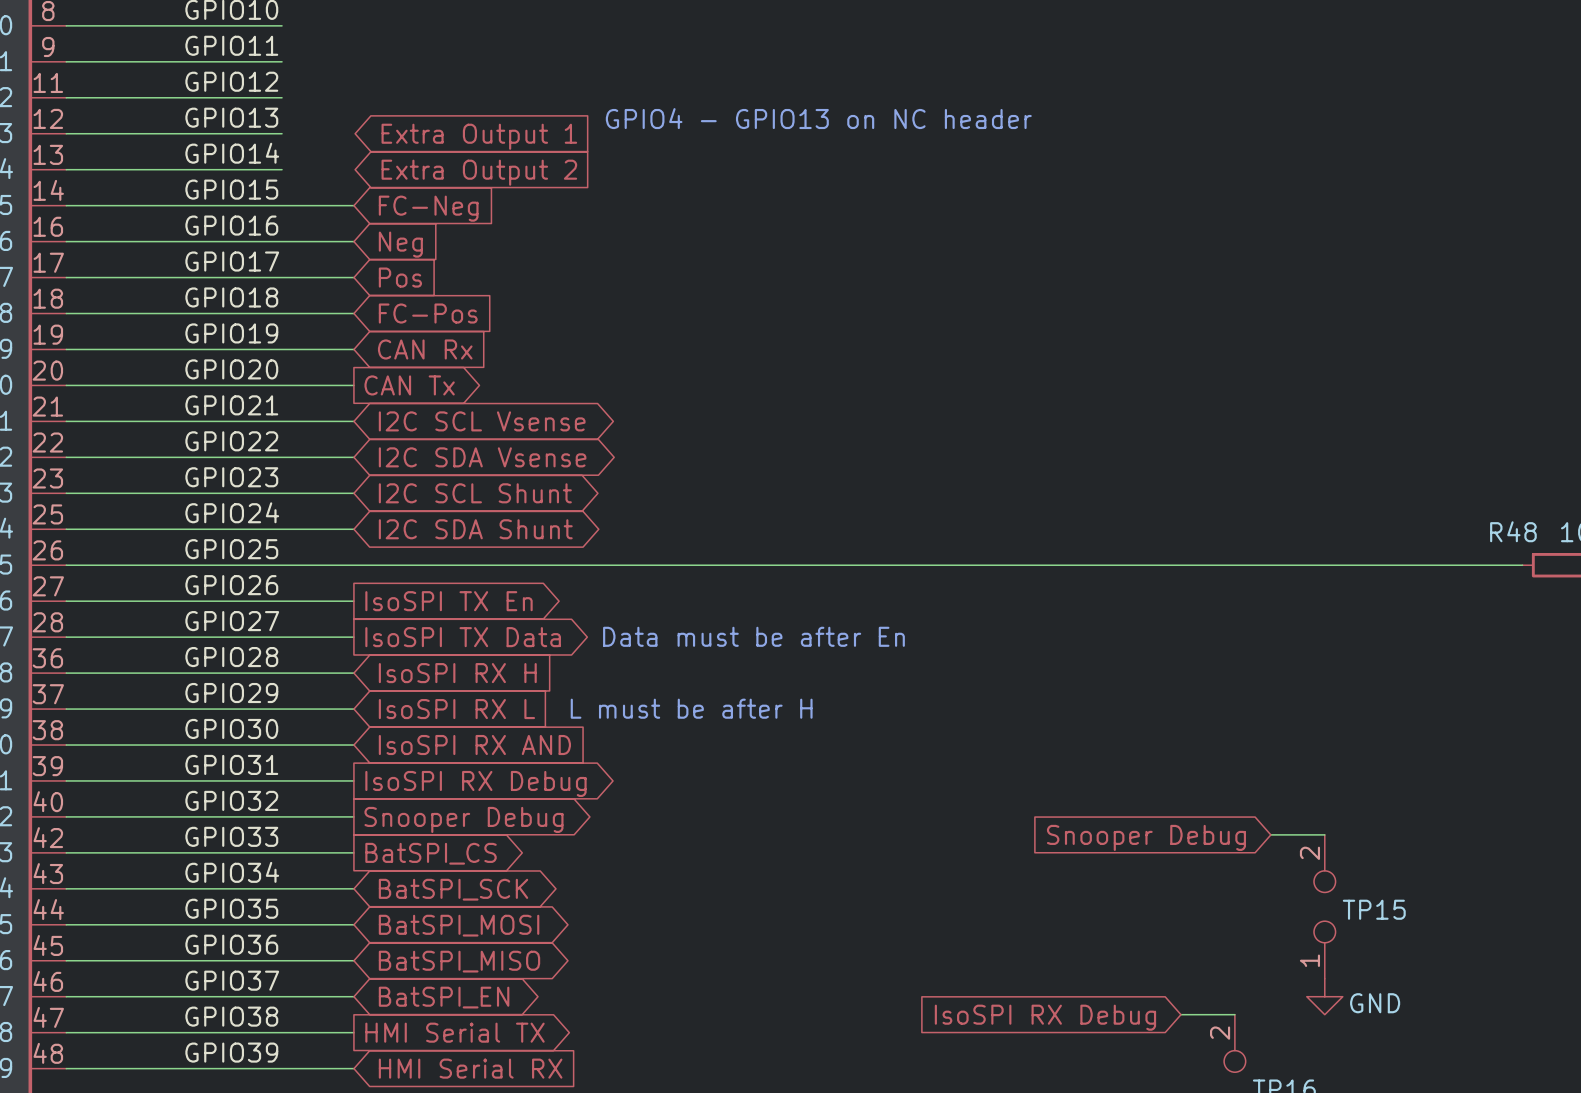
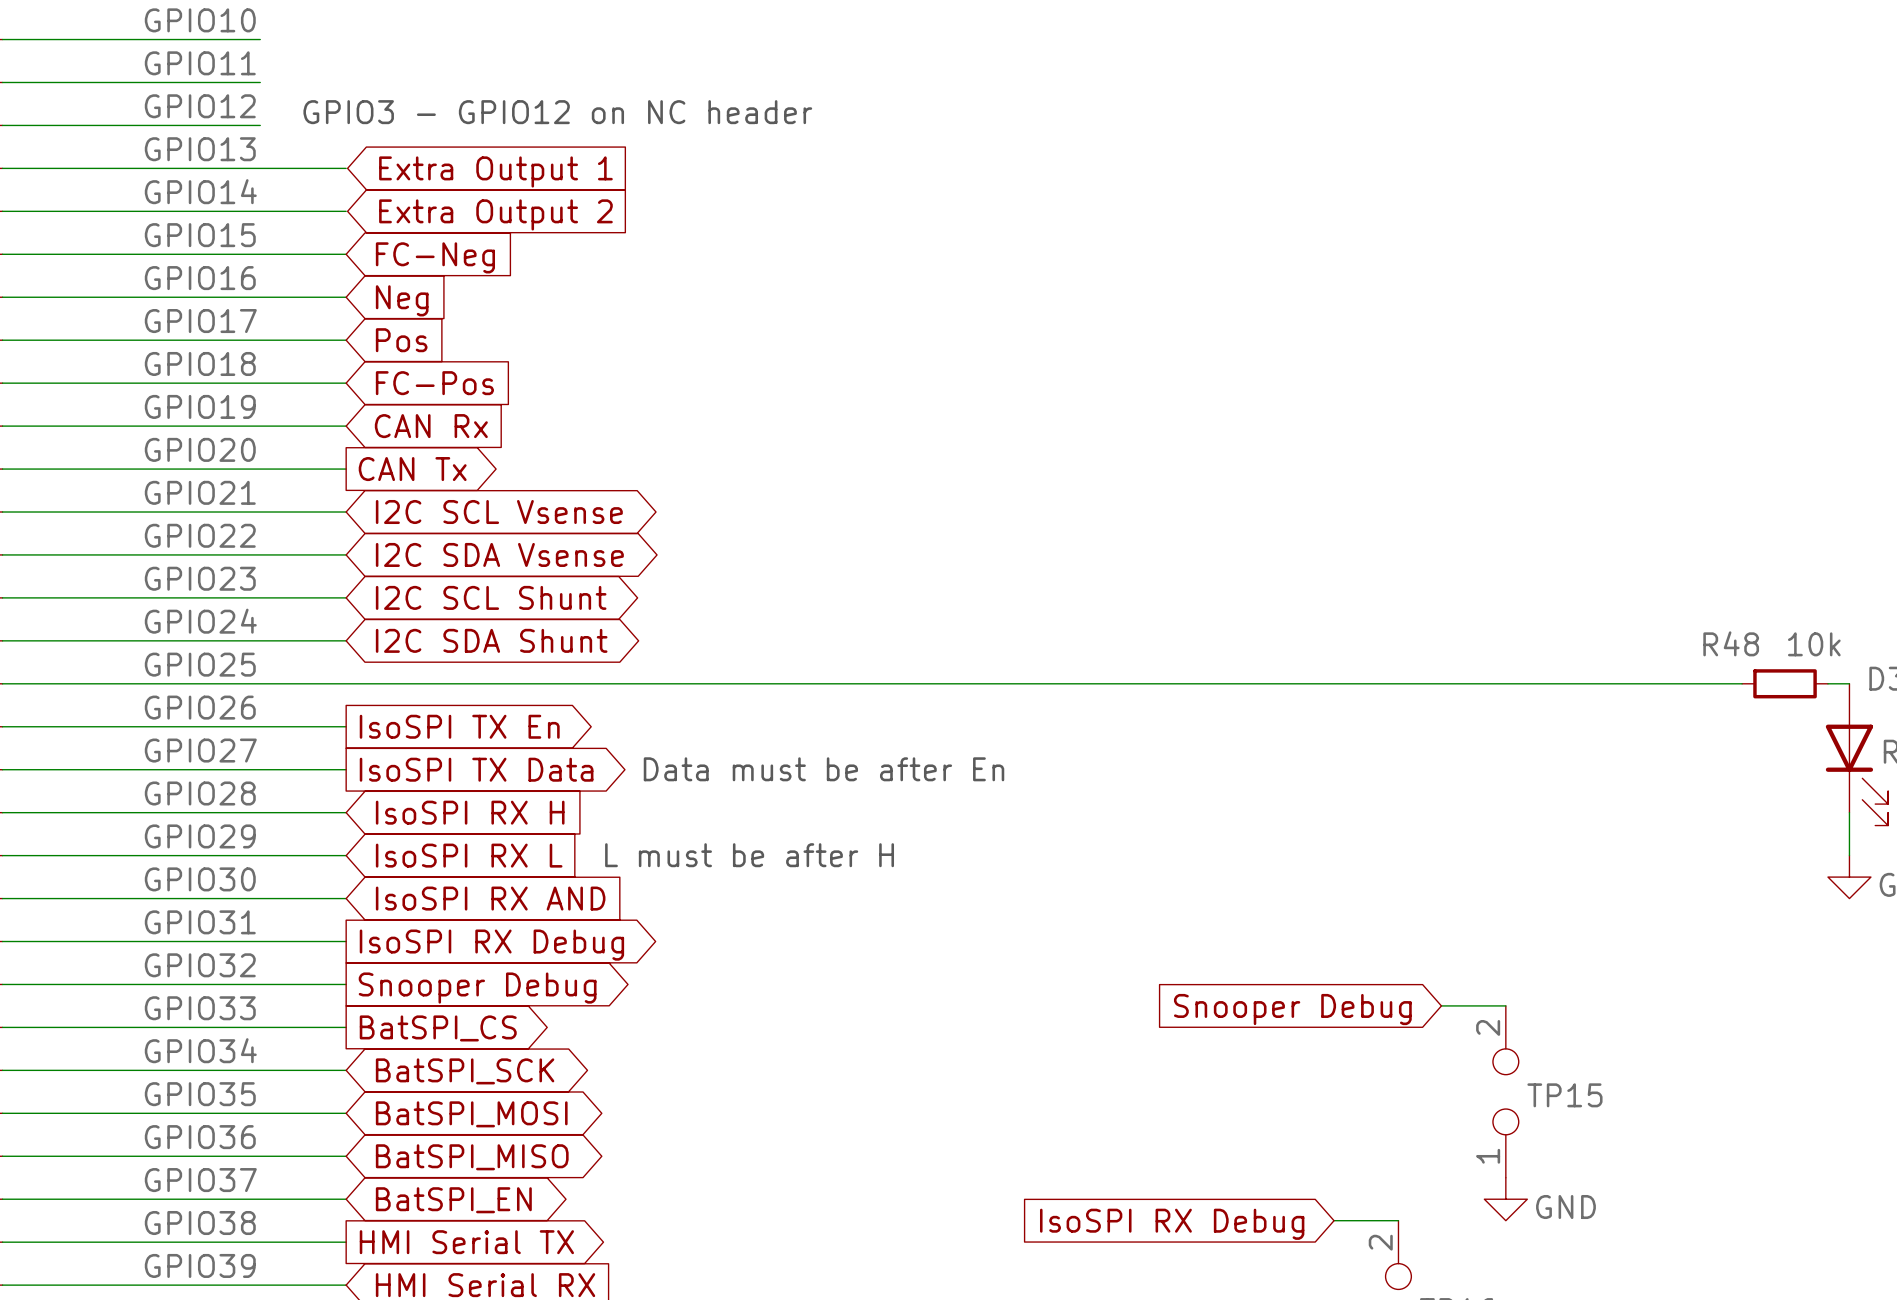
text: GPIO4 - GPIO13 on NC header (818, 118) -> GPIO3 - GPIO12 on NC header (557, 112)
wire: none -> (260, 168) (346, 168)
wire: none -> (260, 211) (346, 211)

